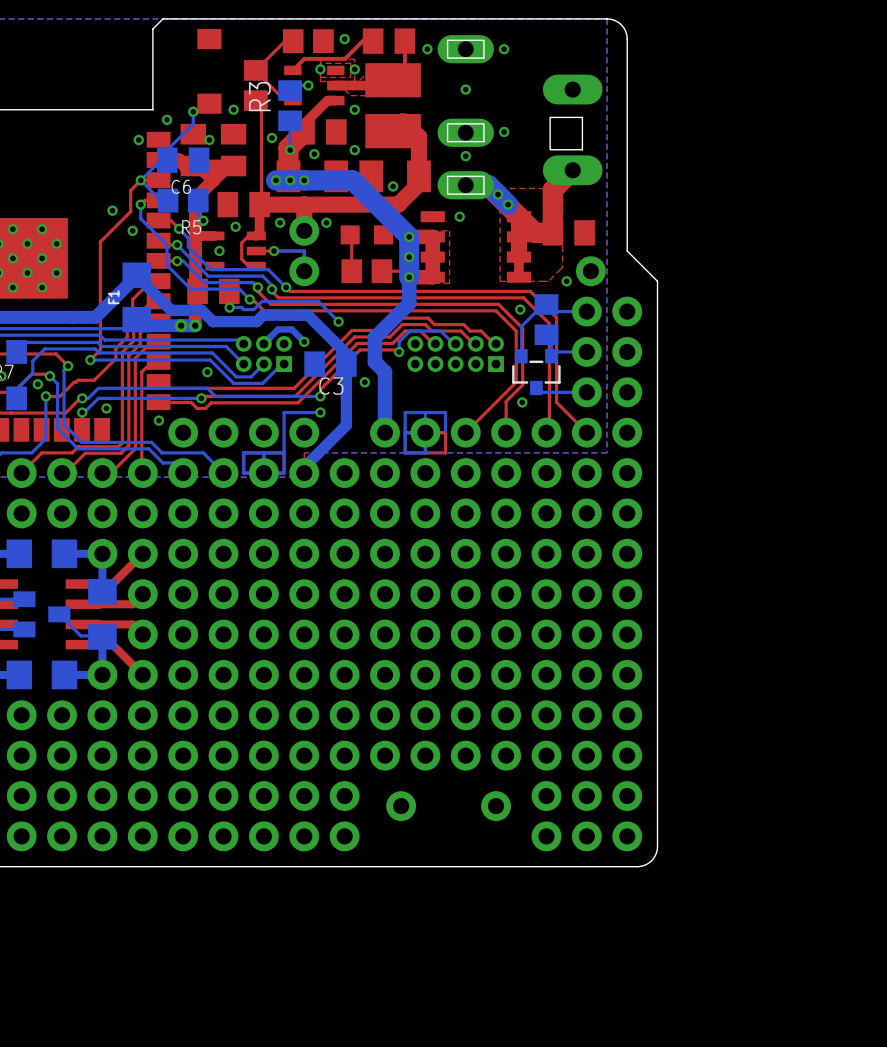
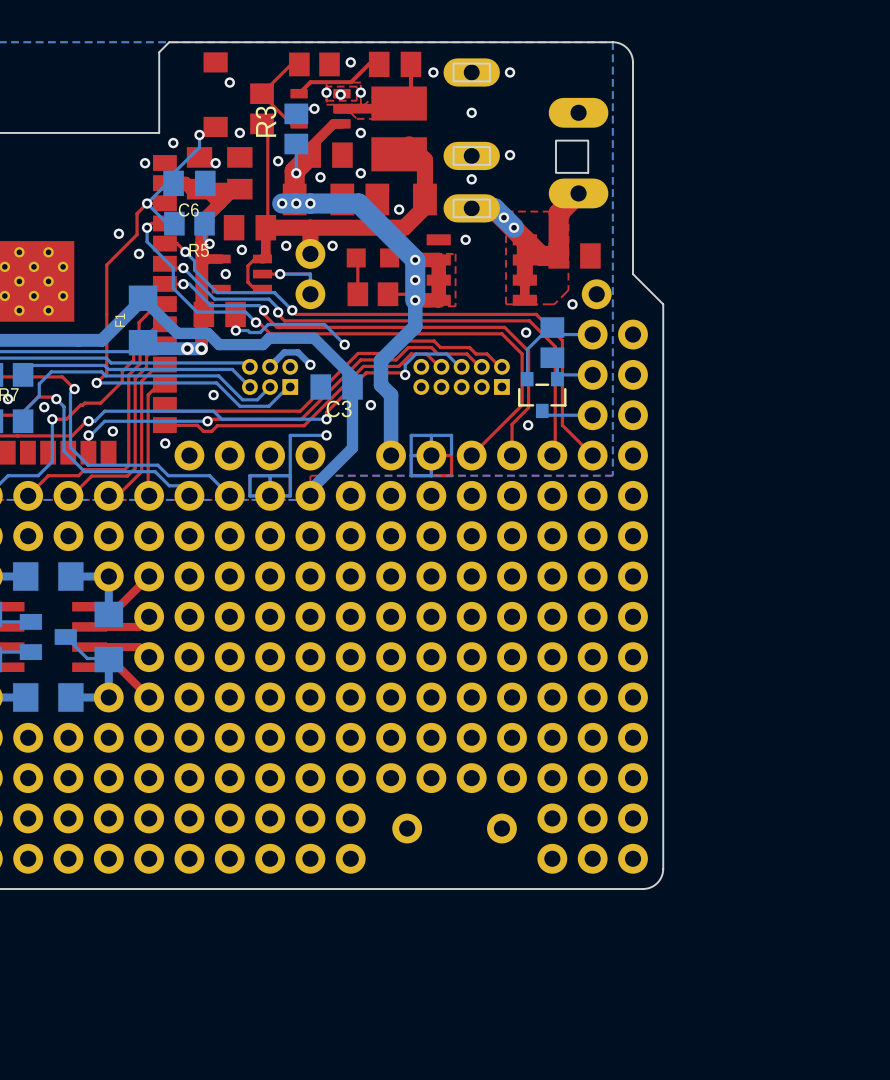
via: none -> (229, 82)
via: none -> (340, 94)

